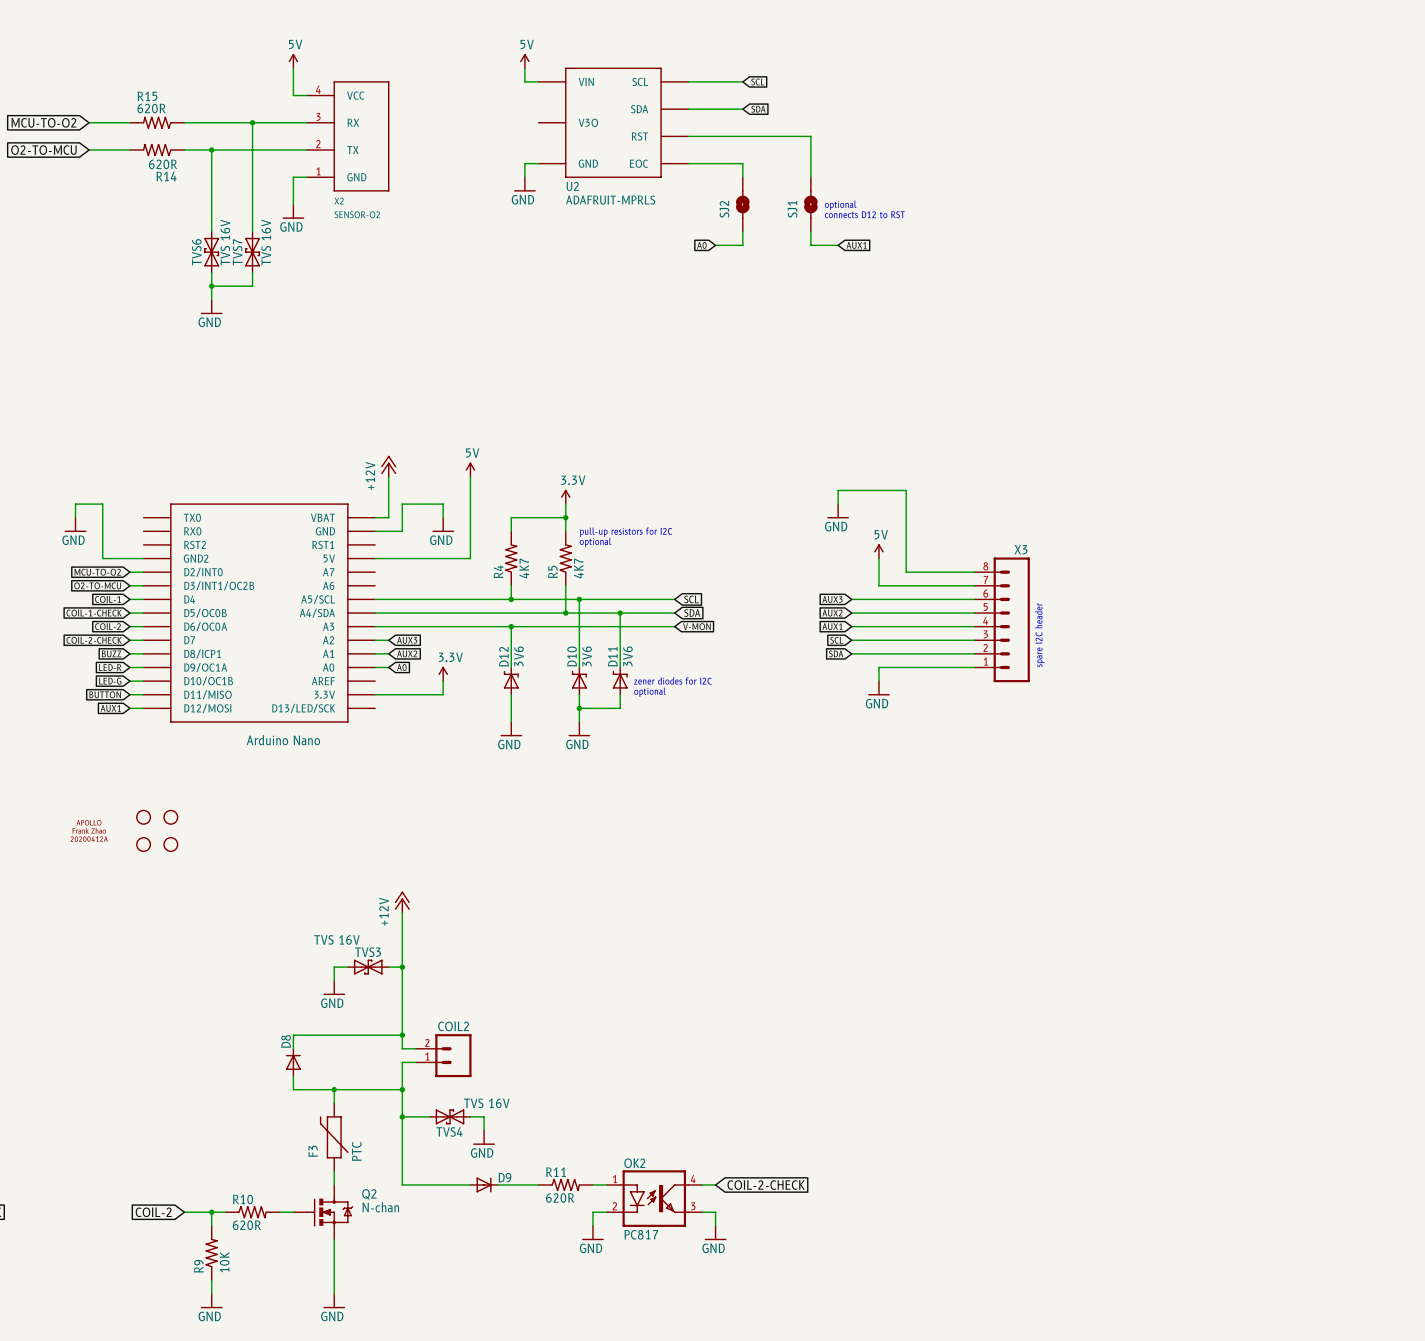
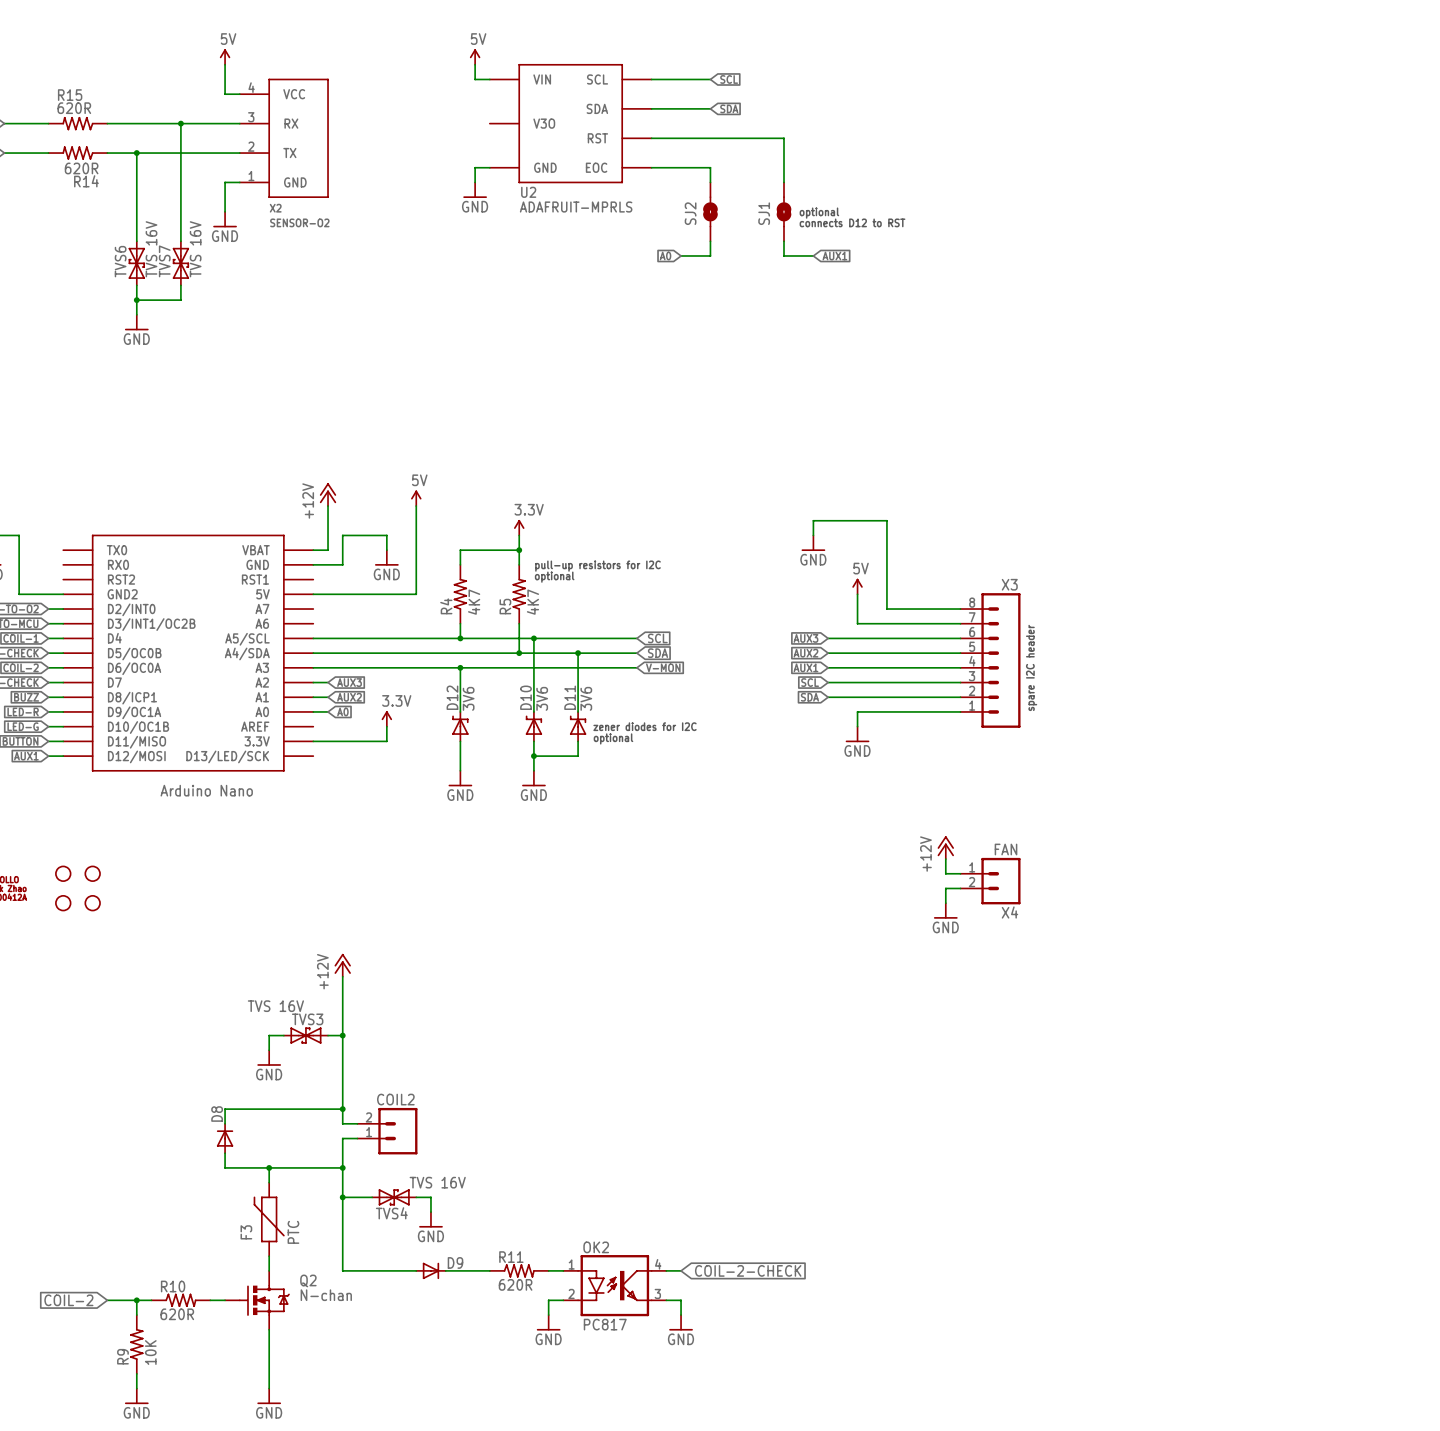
power symbol: none -> +12V (945, 847)
wire: none -> (945, 859) (945, 873) (960, 873)
X4: none -> FAN (990, 881)
wire: none -> (960, 888) (945, 888) (945, 903)
power symbol: none -> GND (945, 910)

